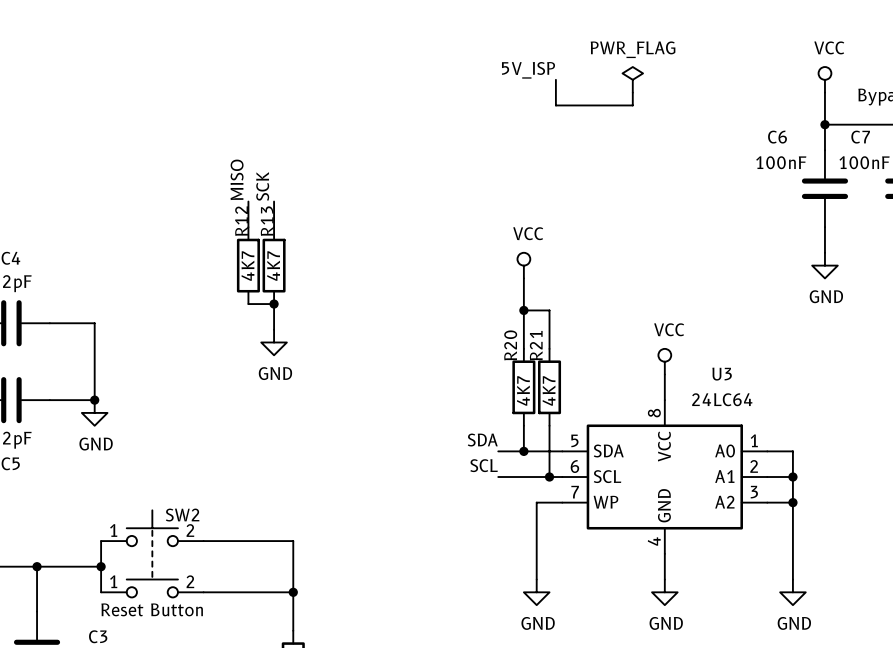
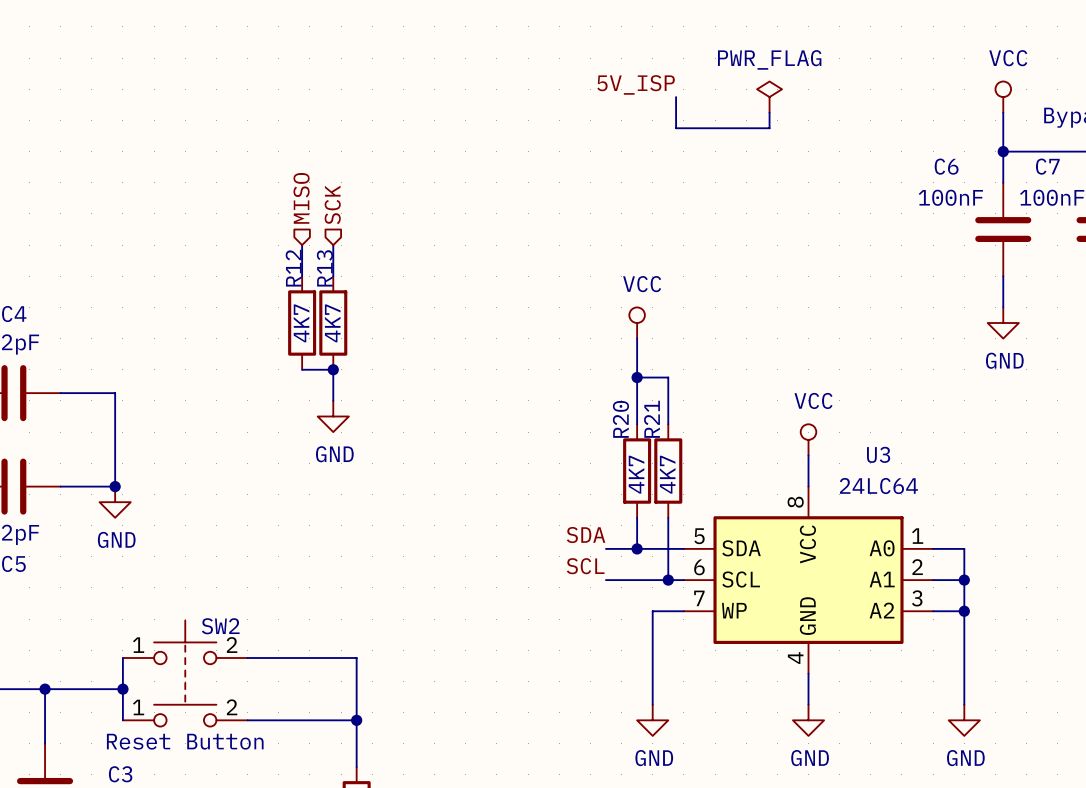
hierarchical label: none -> MISO (301, 198)
hierarchical label: none -> SCK (332, 204)
label: MISO (237, 179) -> none
label: SCK (262, 186) -> none

